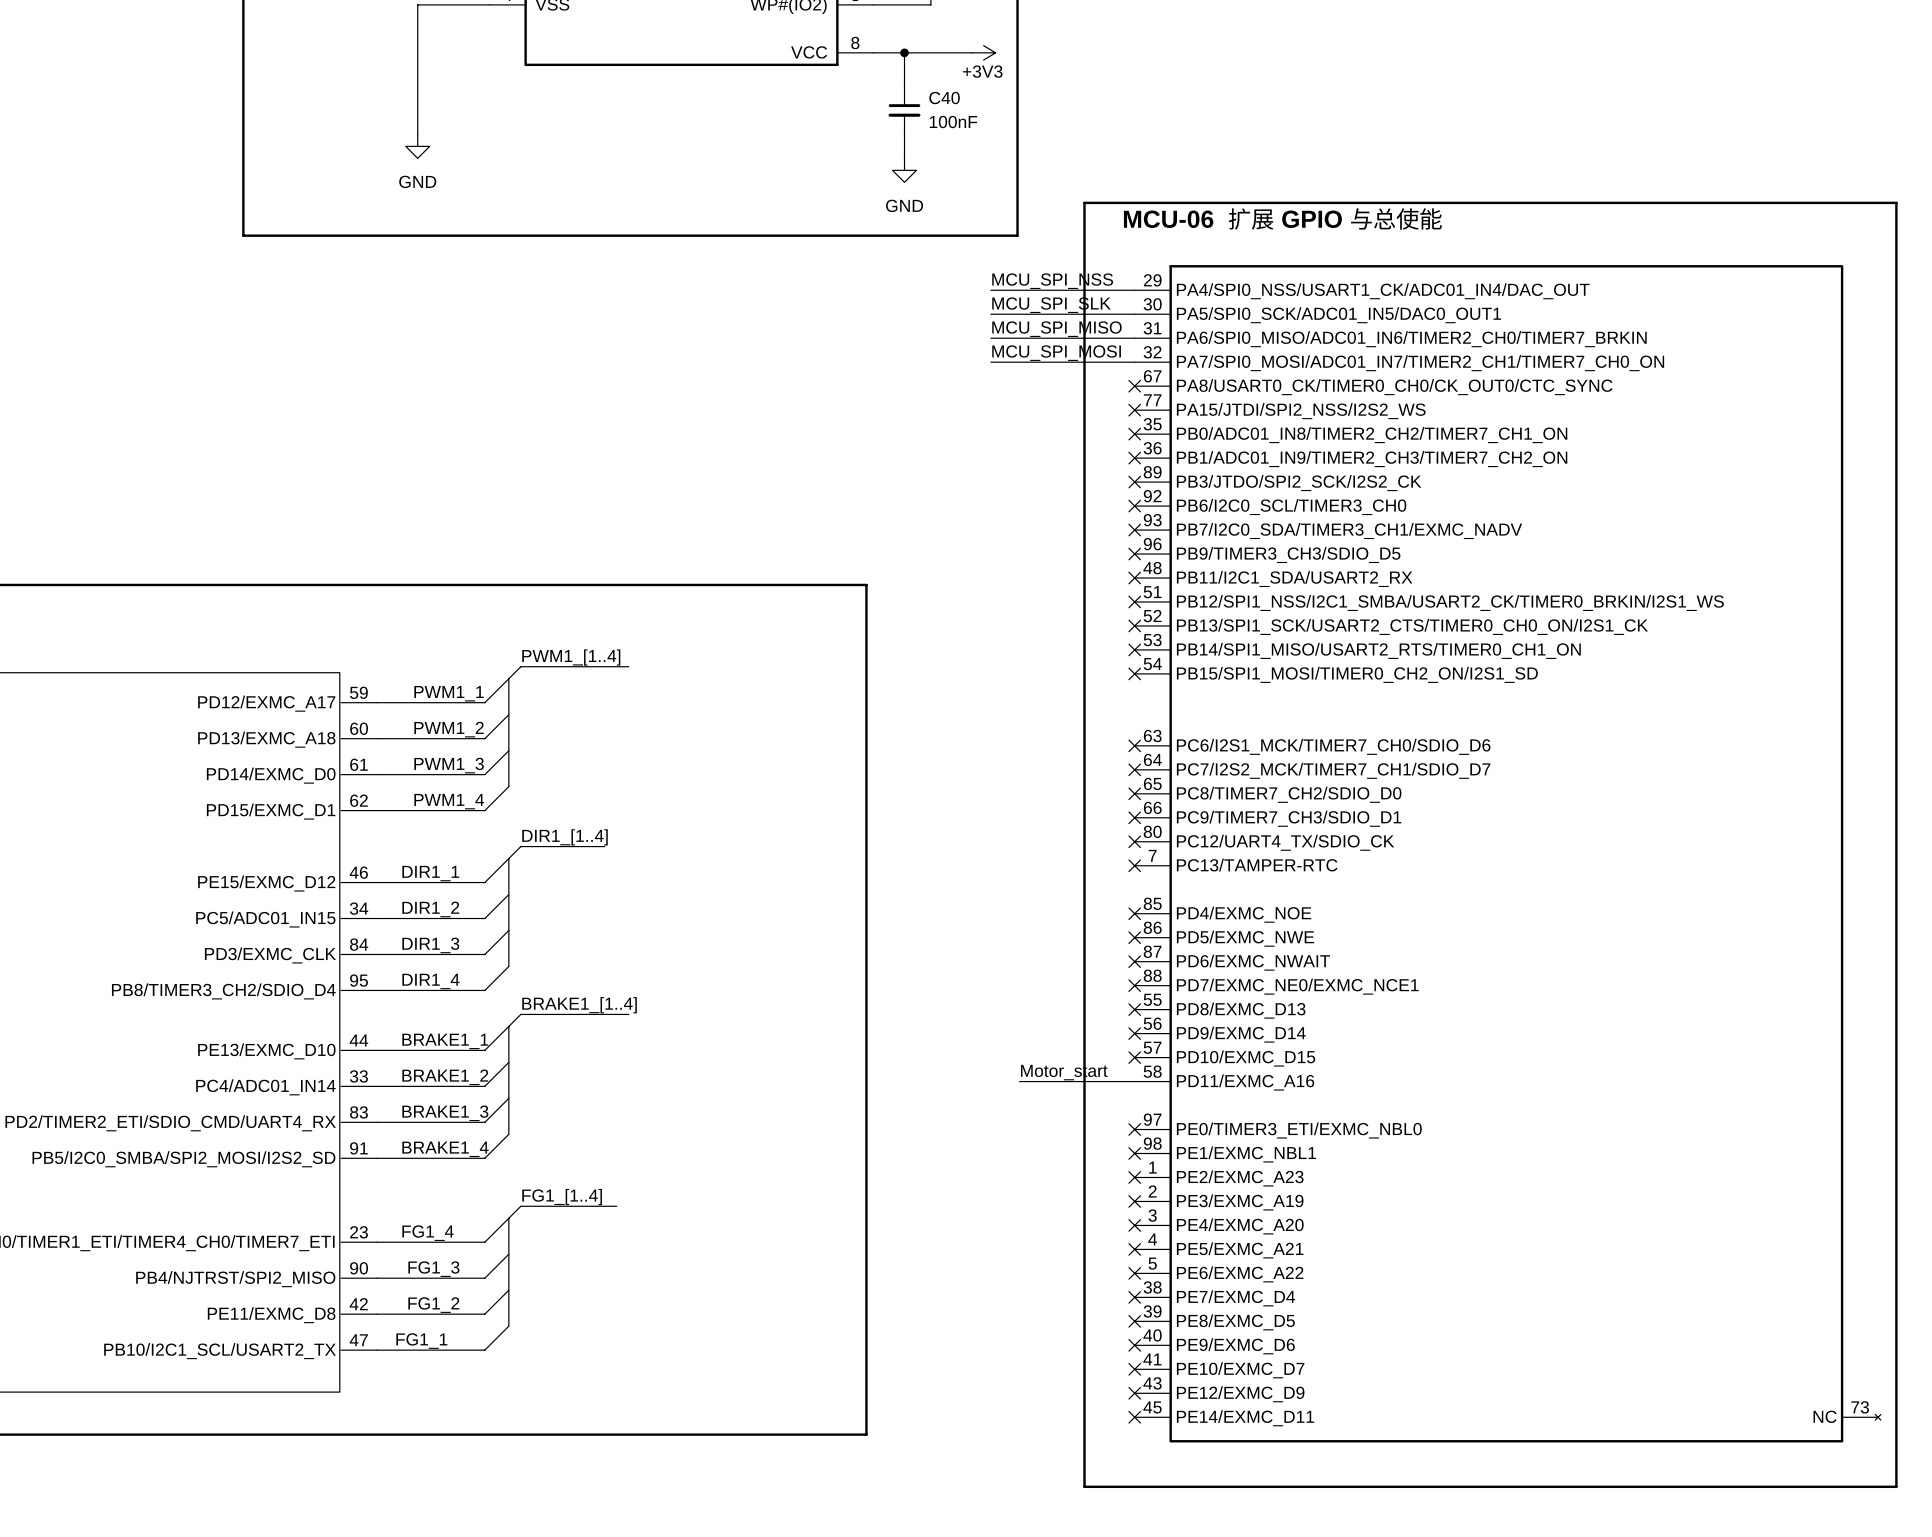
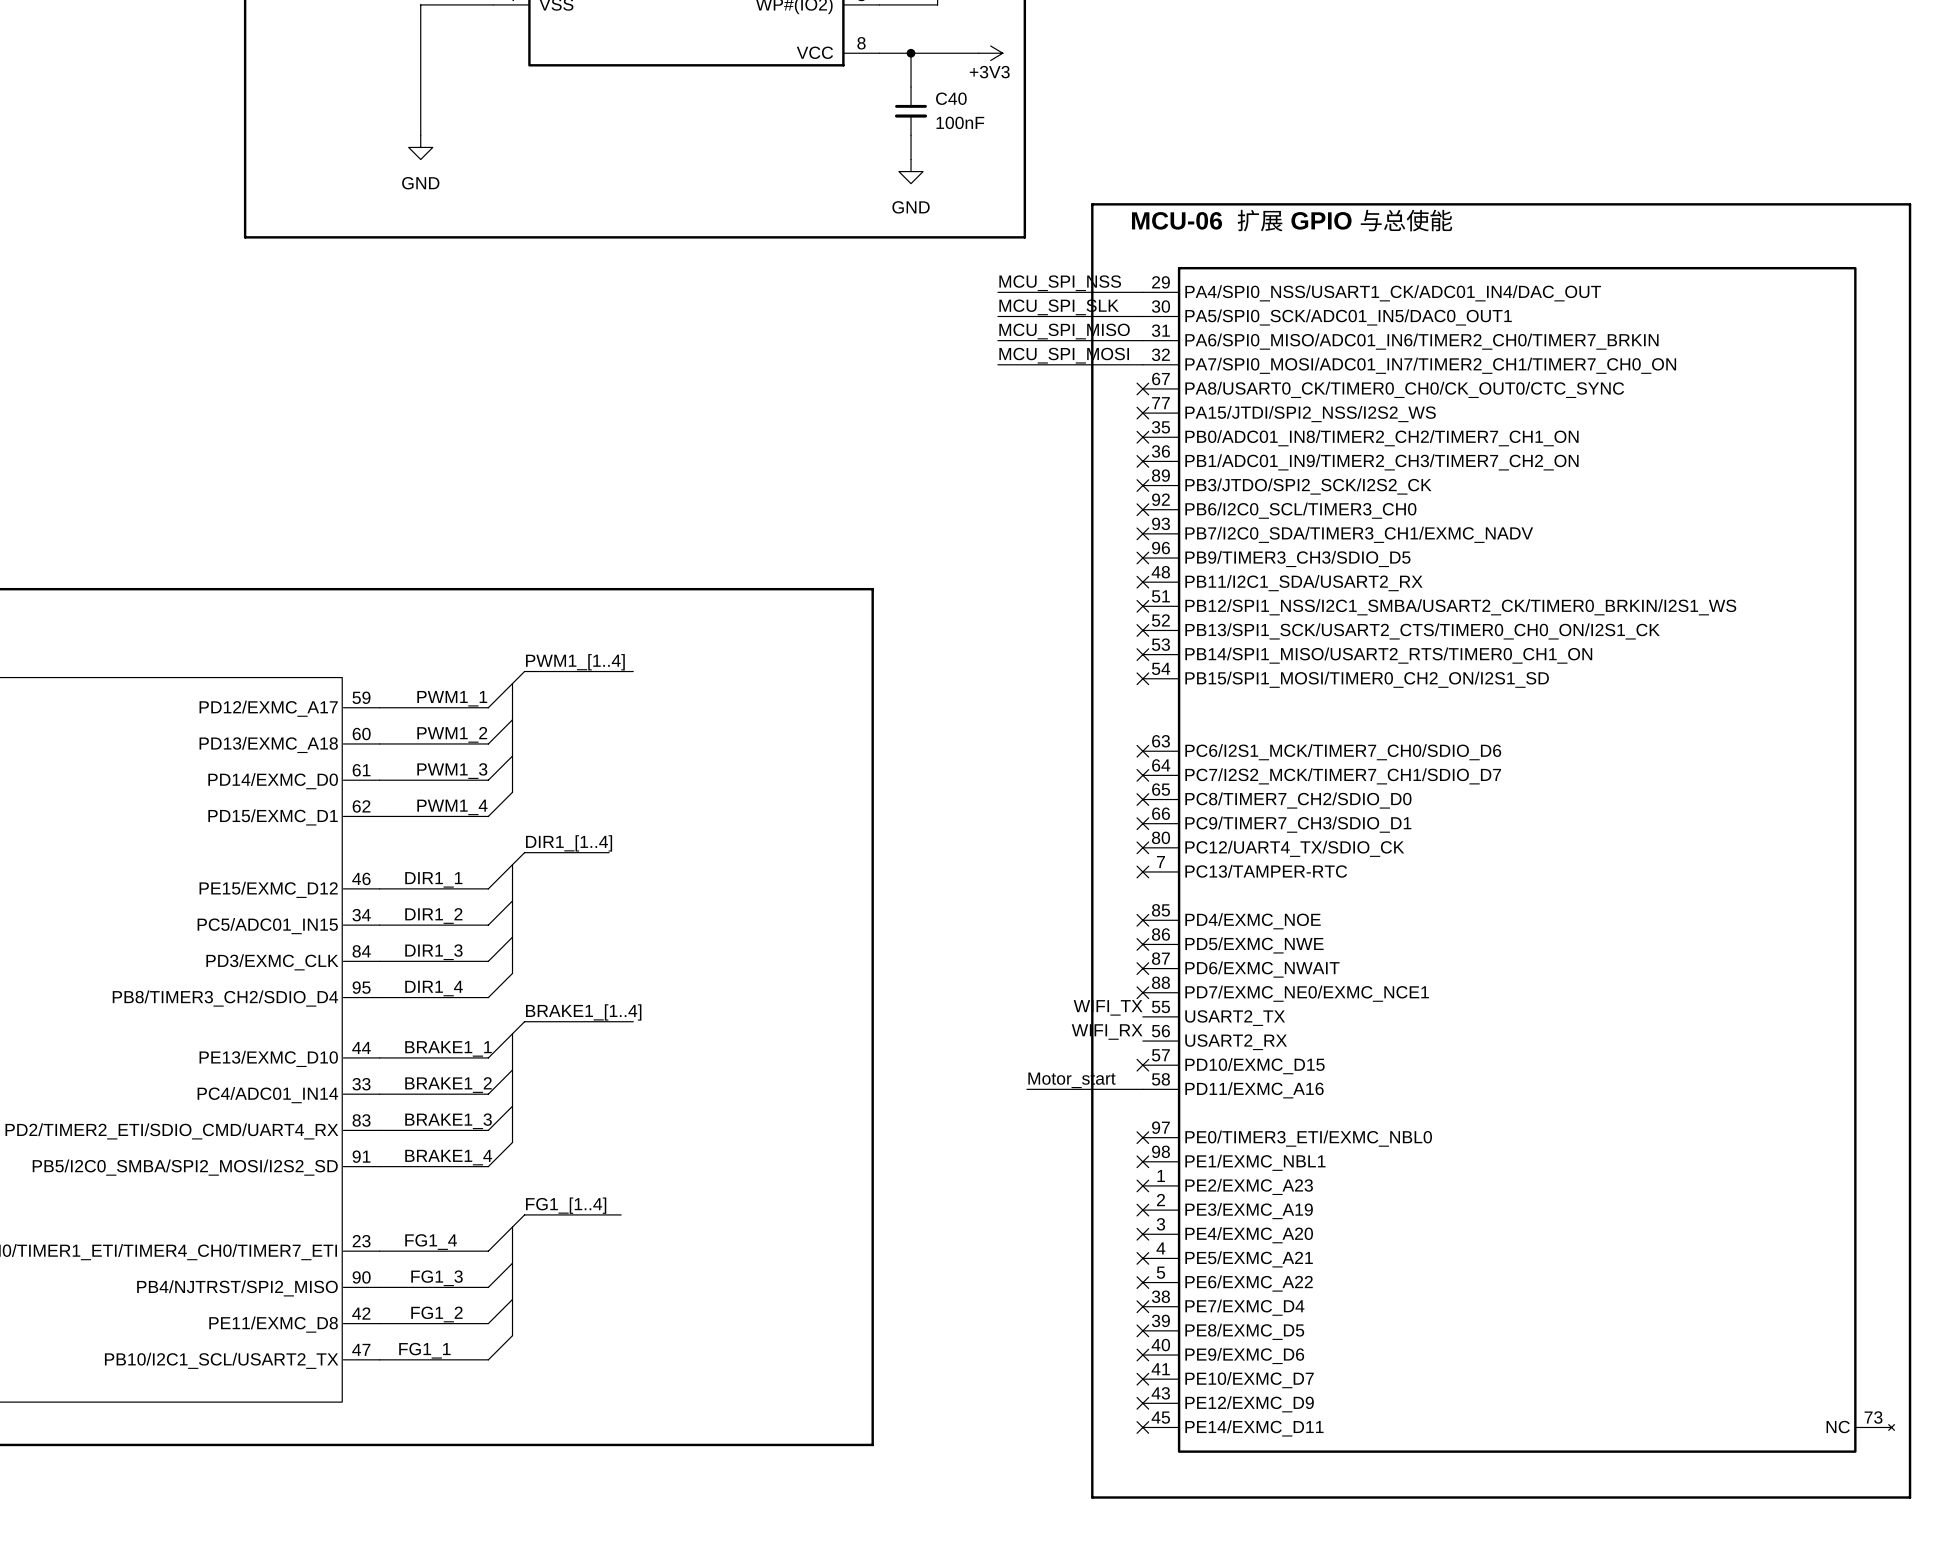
label: none -> WIFI_TX (1108, 1007)
no-connect mark: (1134, 1009) -> none
part pin name: PD8/EXMC_D13 (1241, 1010) -> USART2_TX (1235, 1018)
label: none -> WIFI_RX (1107, 1032)
no-connect mark: (1134, 1033) -> none
part pin name: PD9/EXMC_D14 (1241, 1034) -> USART2_RX (1236, 1042)

